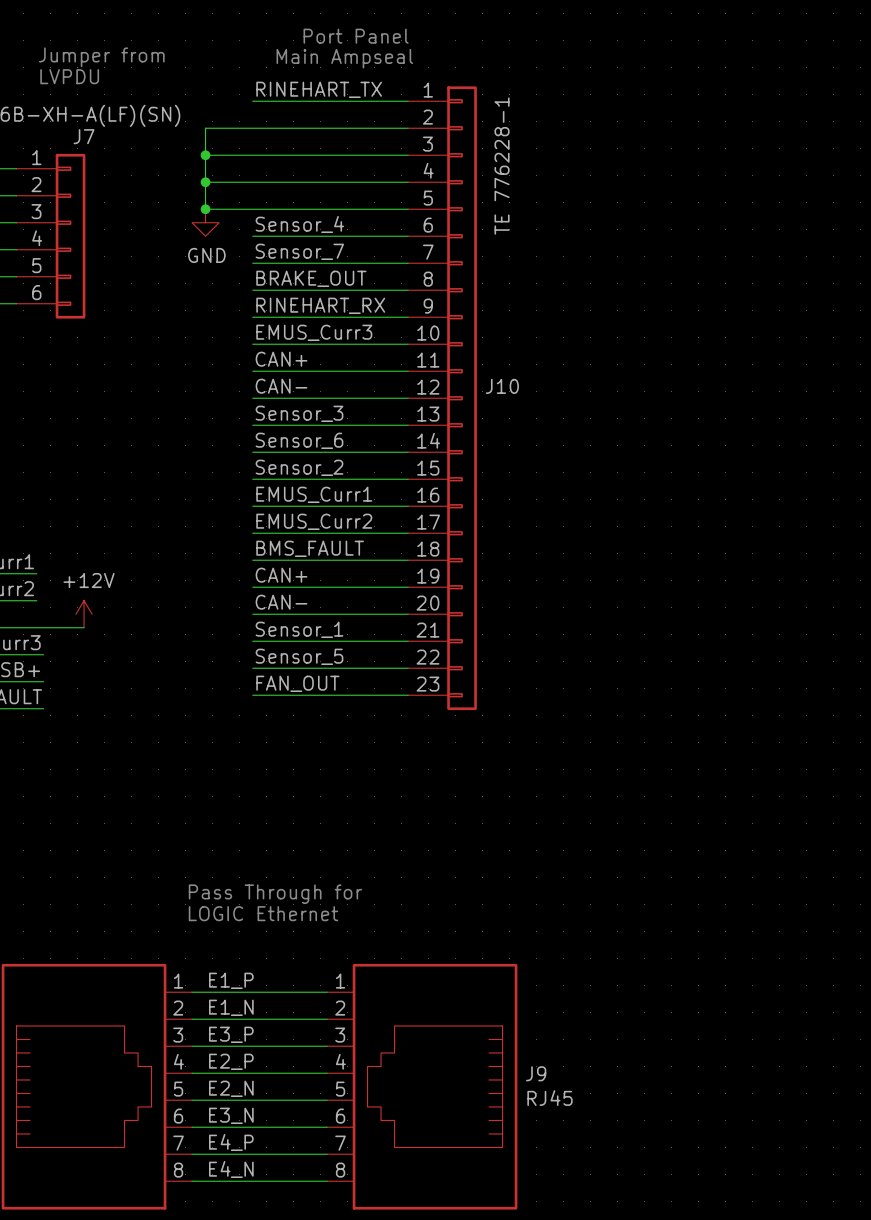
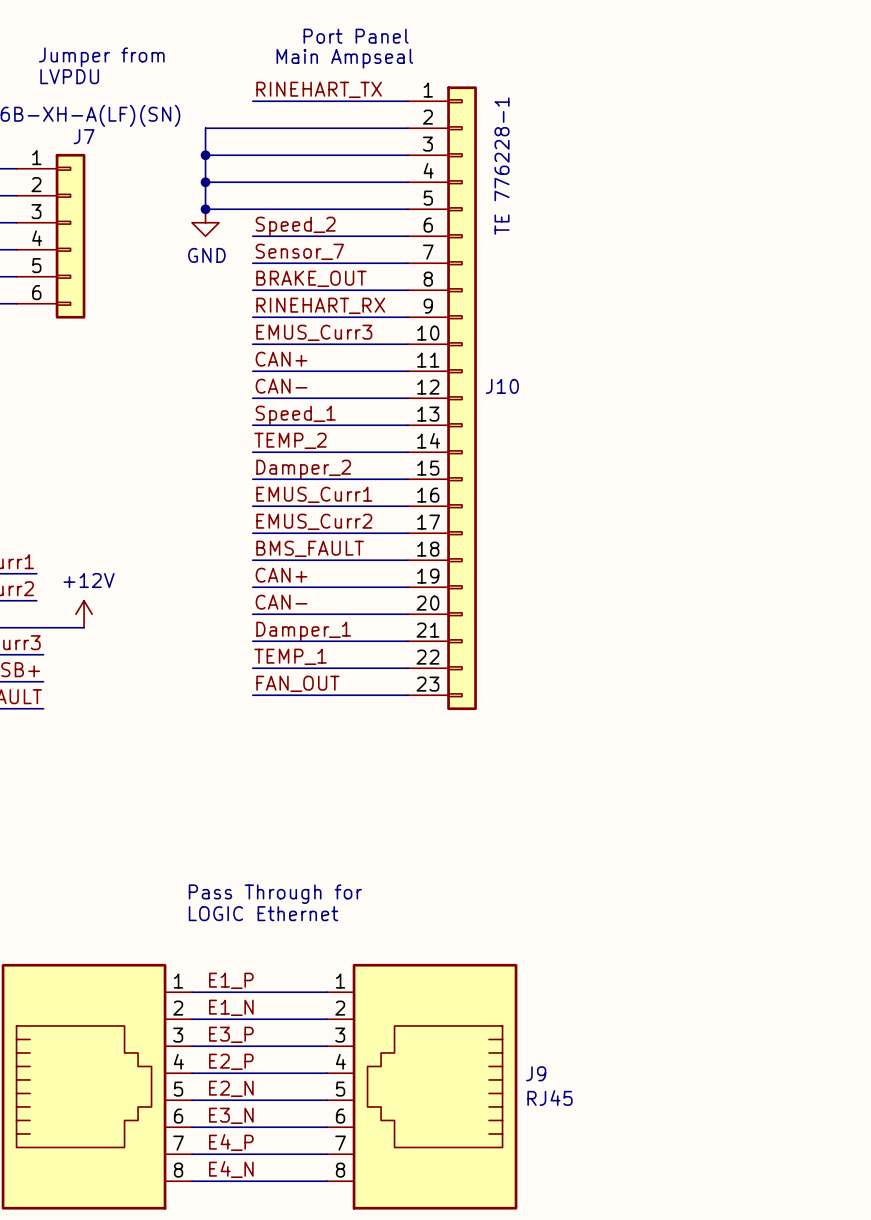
label: Sensor_4 (299, 224) -> Speed_2 (295, 226)
label: Sensor_3 (299, 413) -> Speed_1 (295, 415)
label: Sensor_6 (299, 440) -> TEMP_2 (290, 440)
label: Sensor_2 (299, 467) -> Damper_2 (303, 469)
label: Sensor_1 (299, 629) -> Damper_1 (303, 631)
label: Sensor_5 (299, 656) -> TEMP_1 (290, 656)

